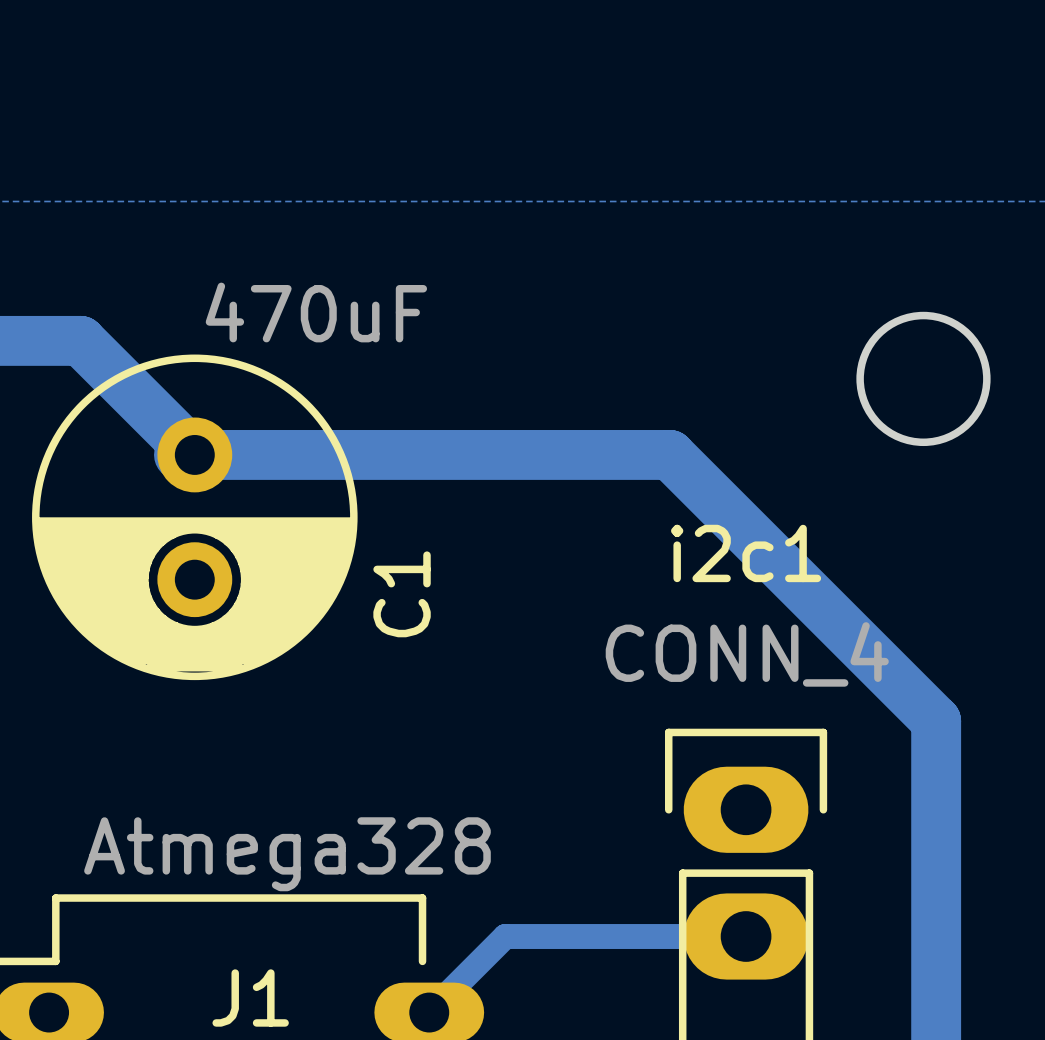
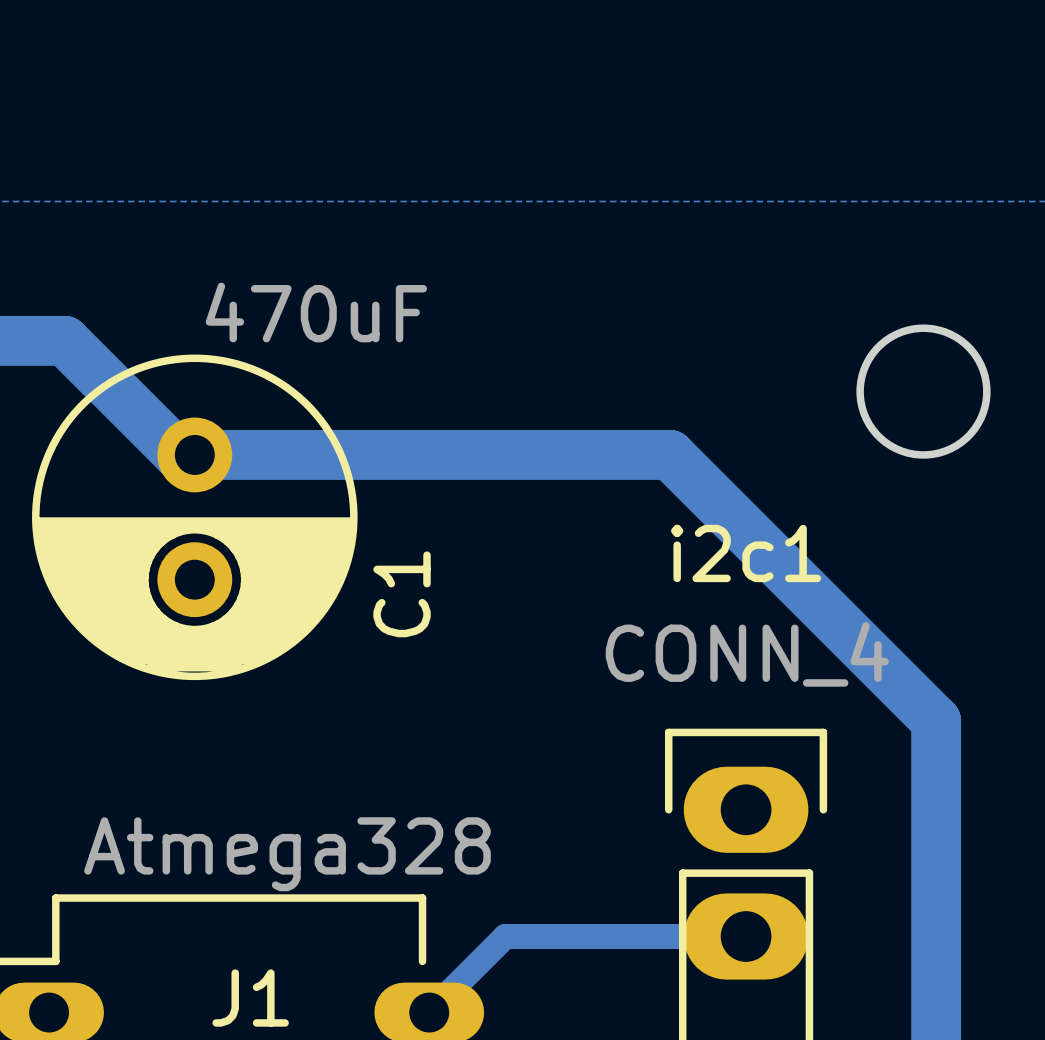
bottom track: (64, 340) (80, 340) (194, 454) -> (64, 340) (178, 454)
round board edge position: (923, 378) -> (923, 391)

